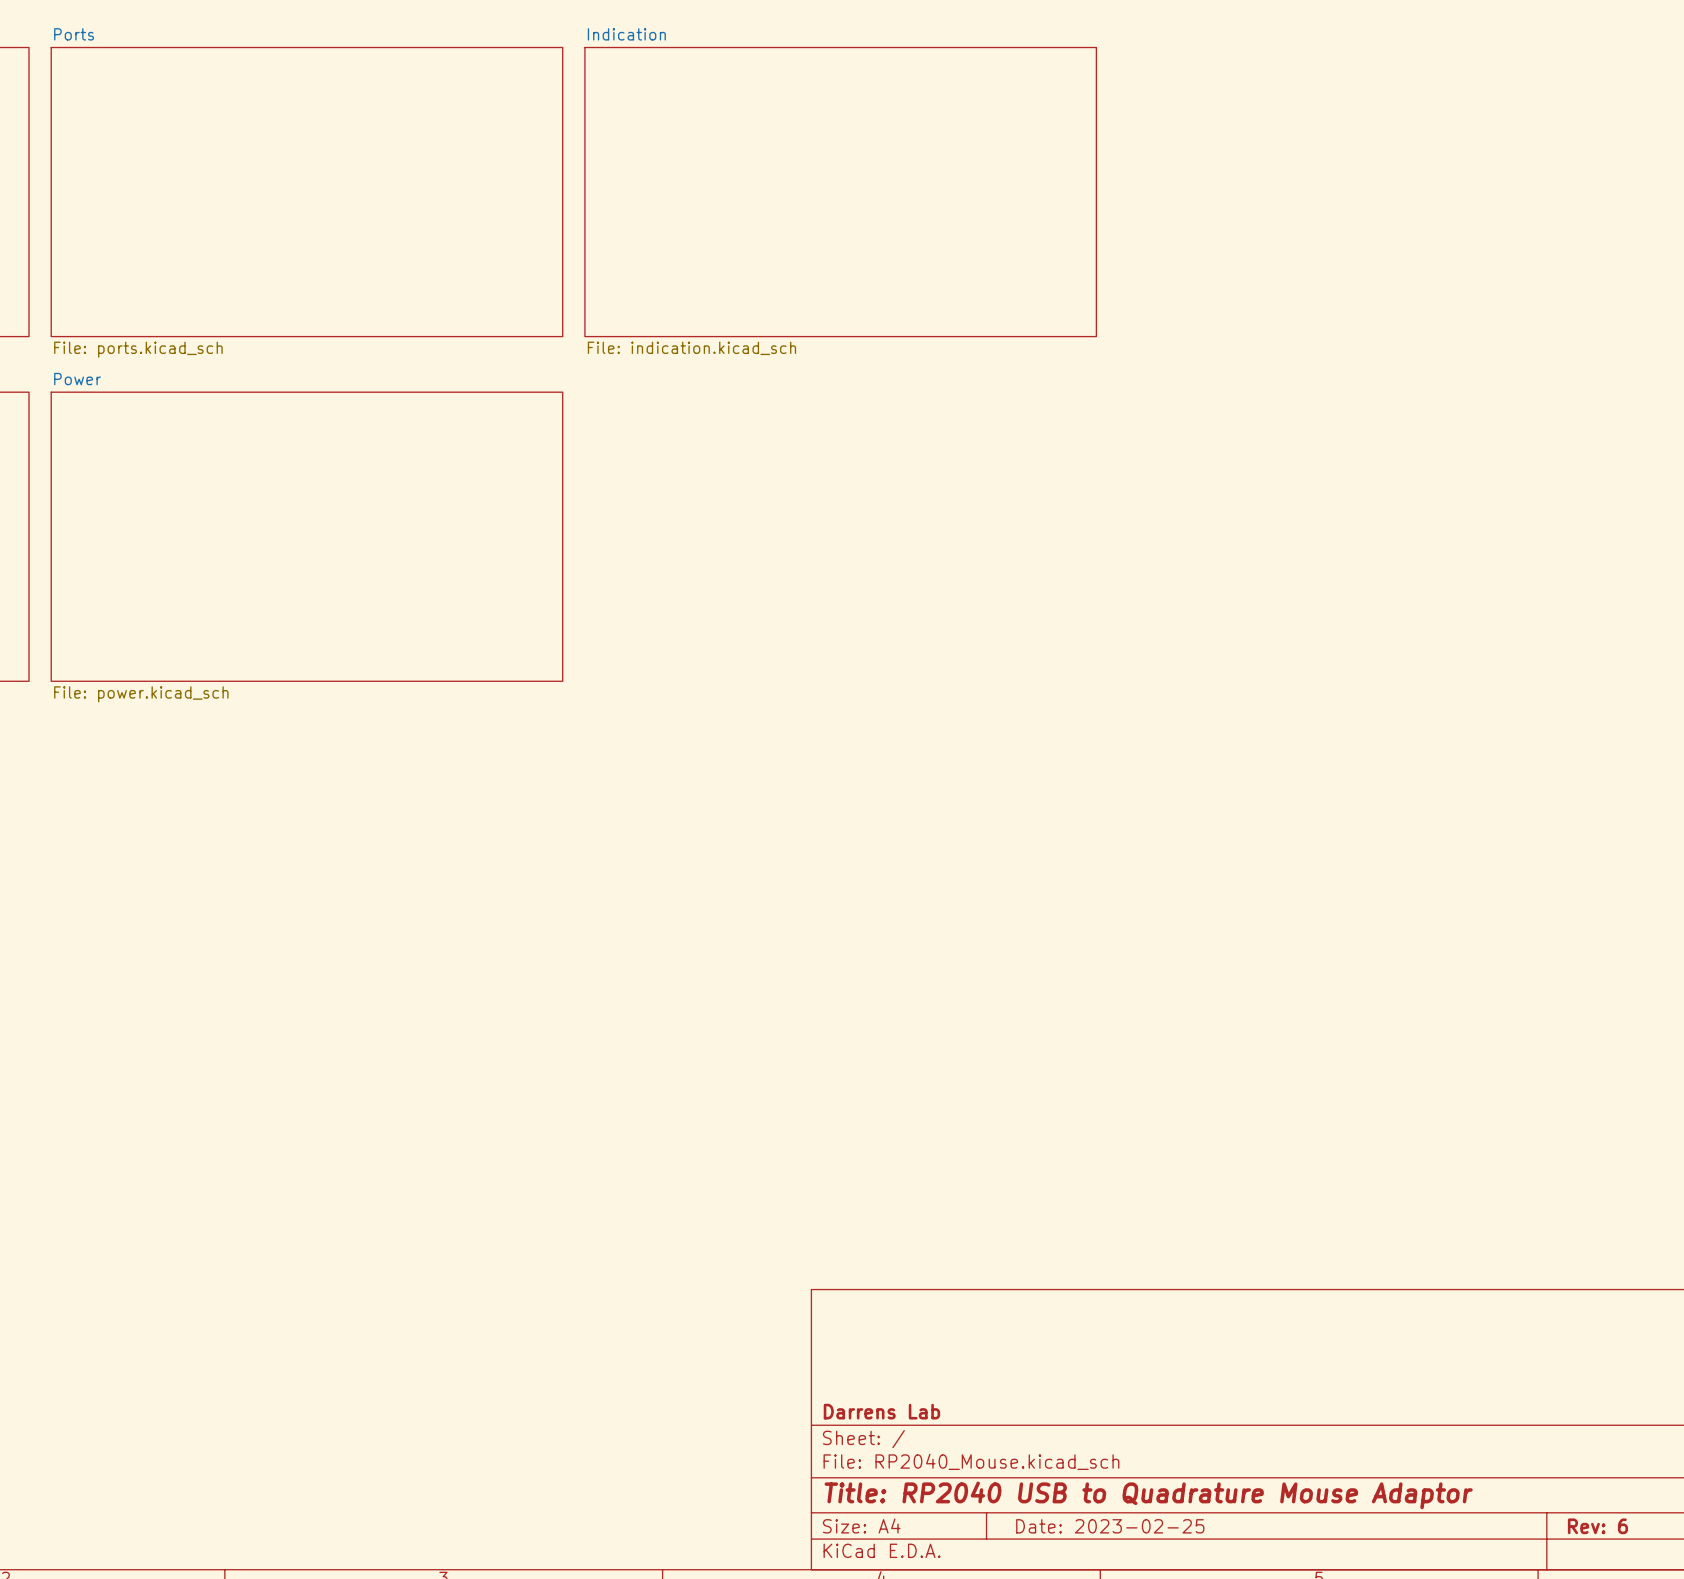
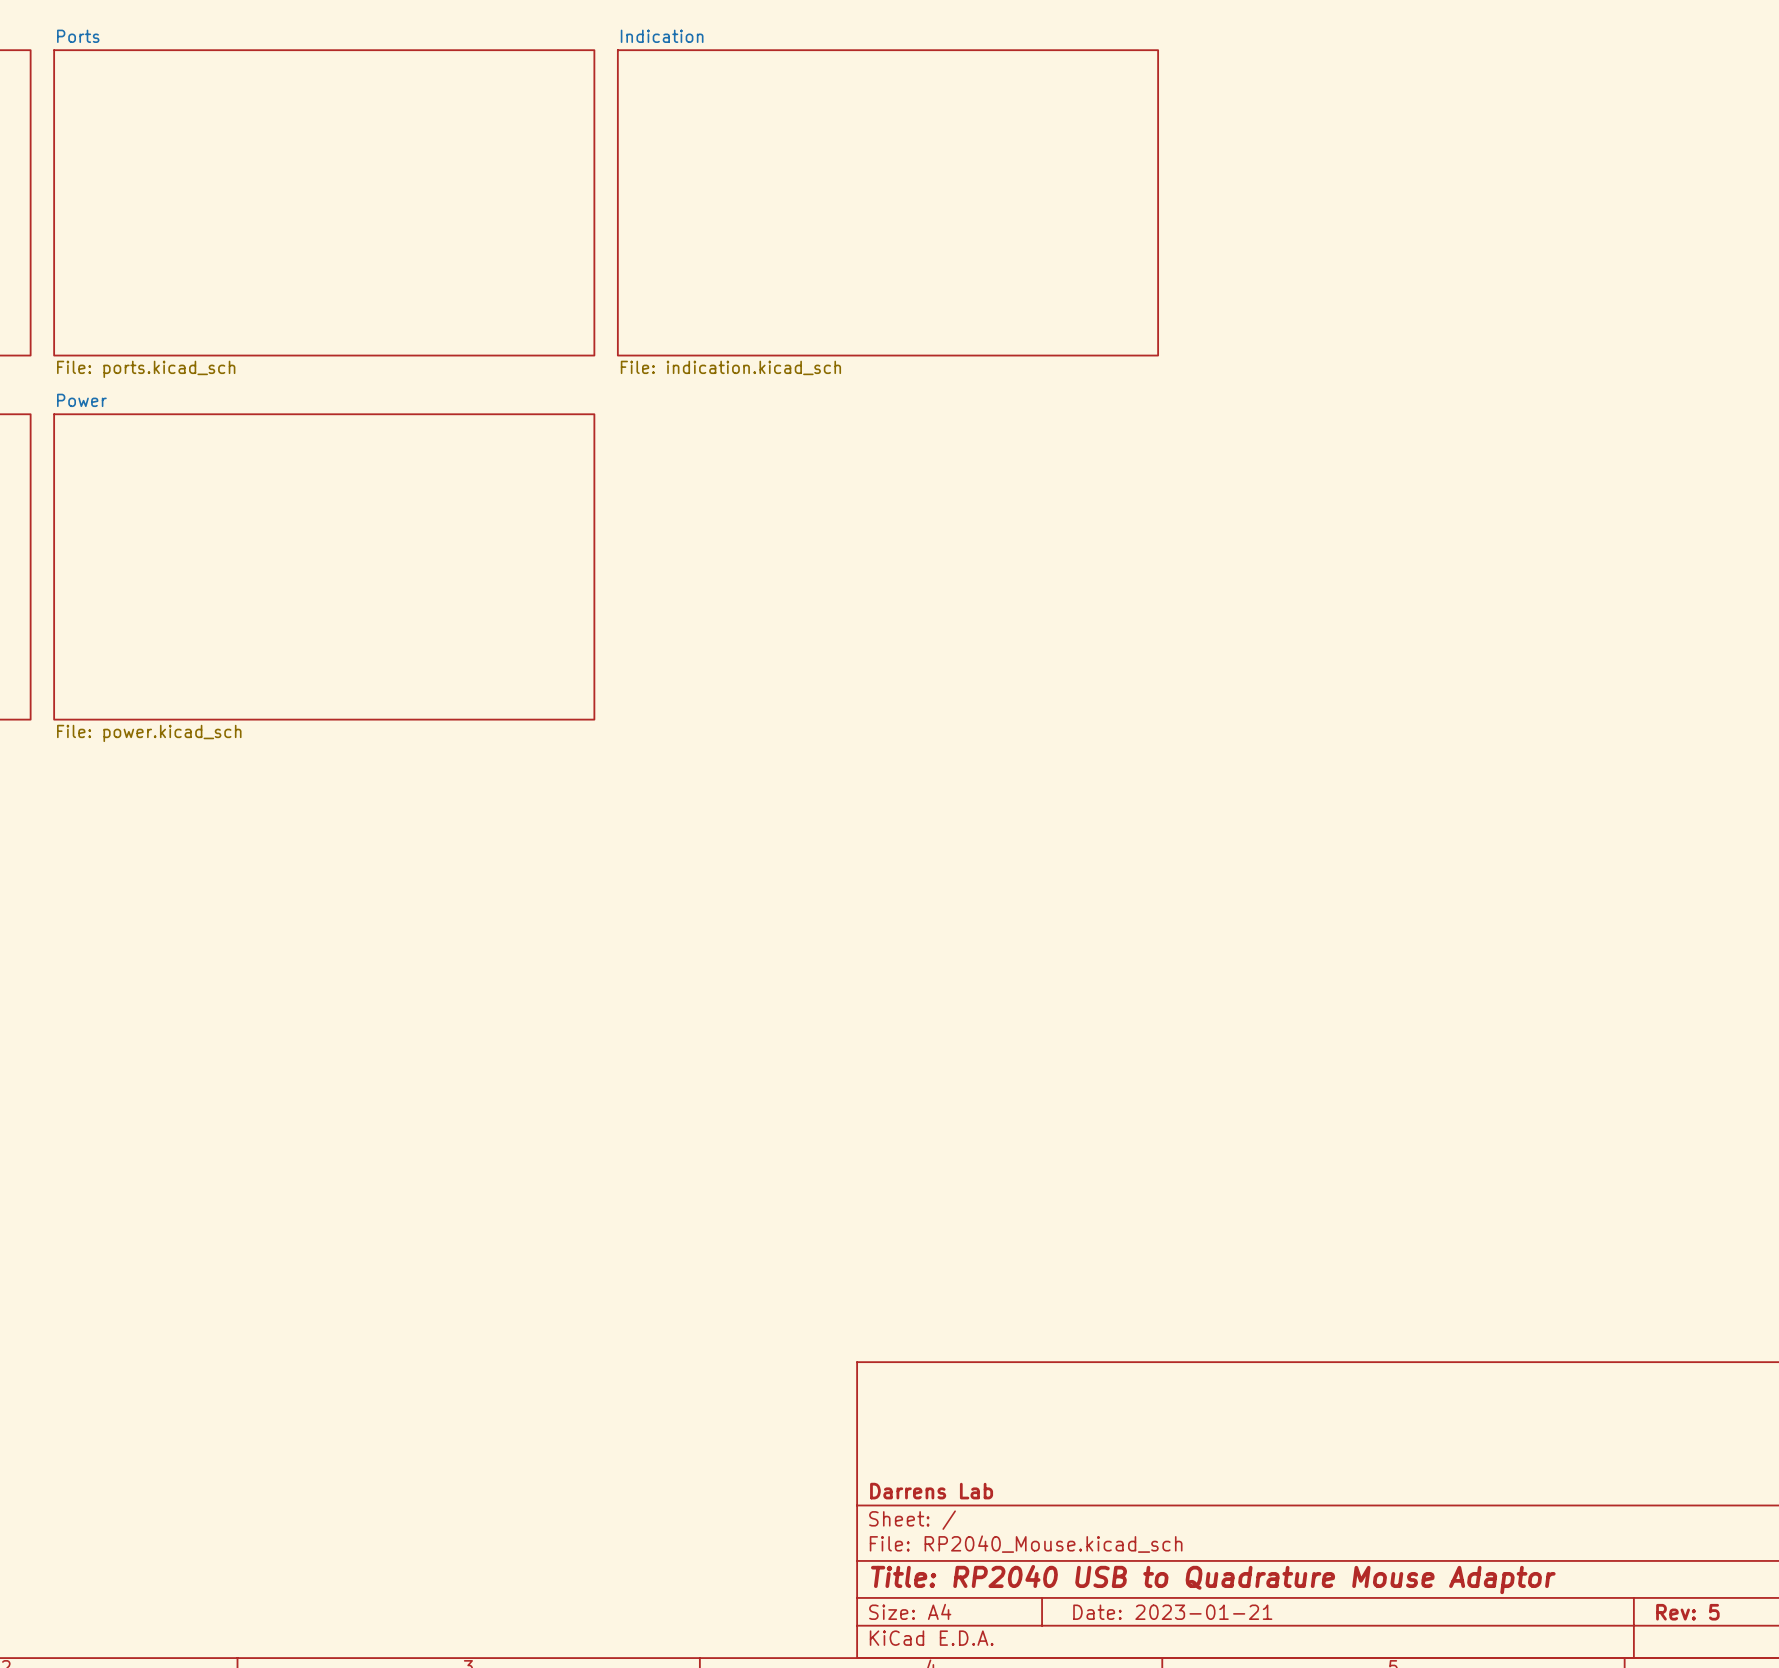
title block: Date: 2023-02-25 (1110, 1526) -> Date: 2023-01-21 (1172, 1612)
title block: Rev: 6 (1597, 1526) -> Rev: 5 (1687, 1612)

